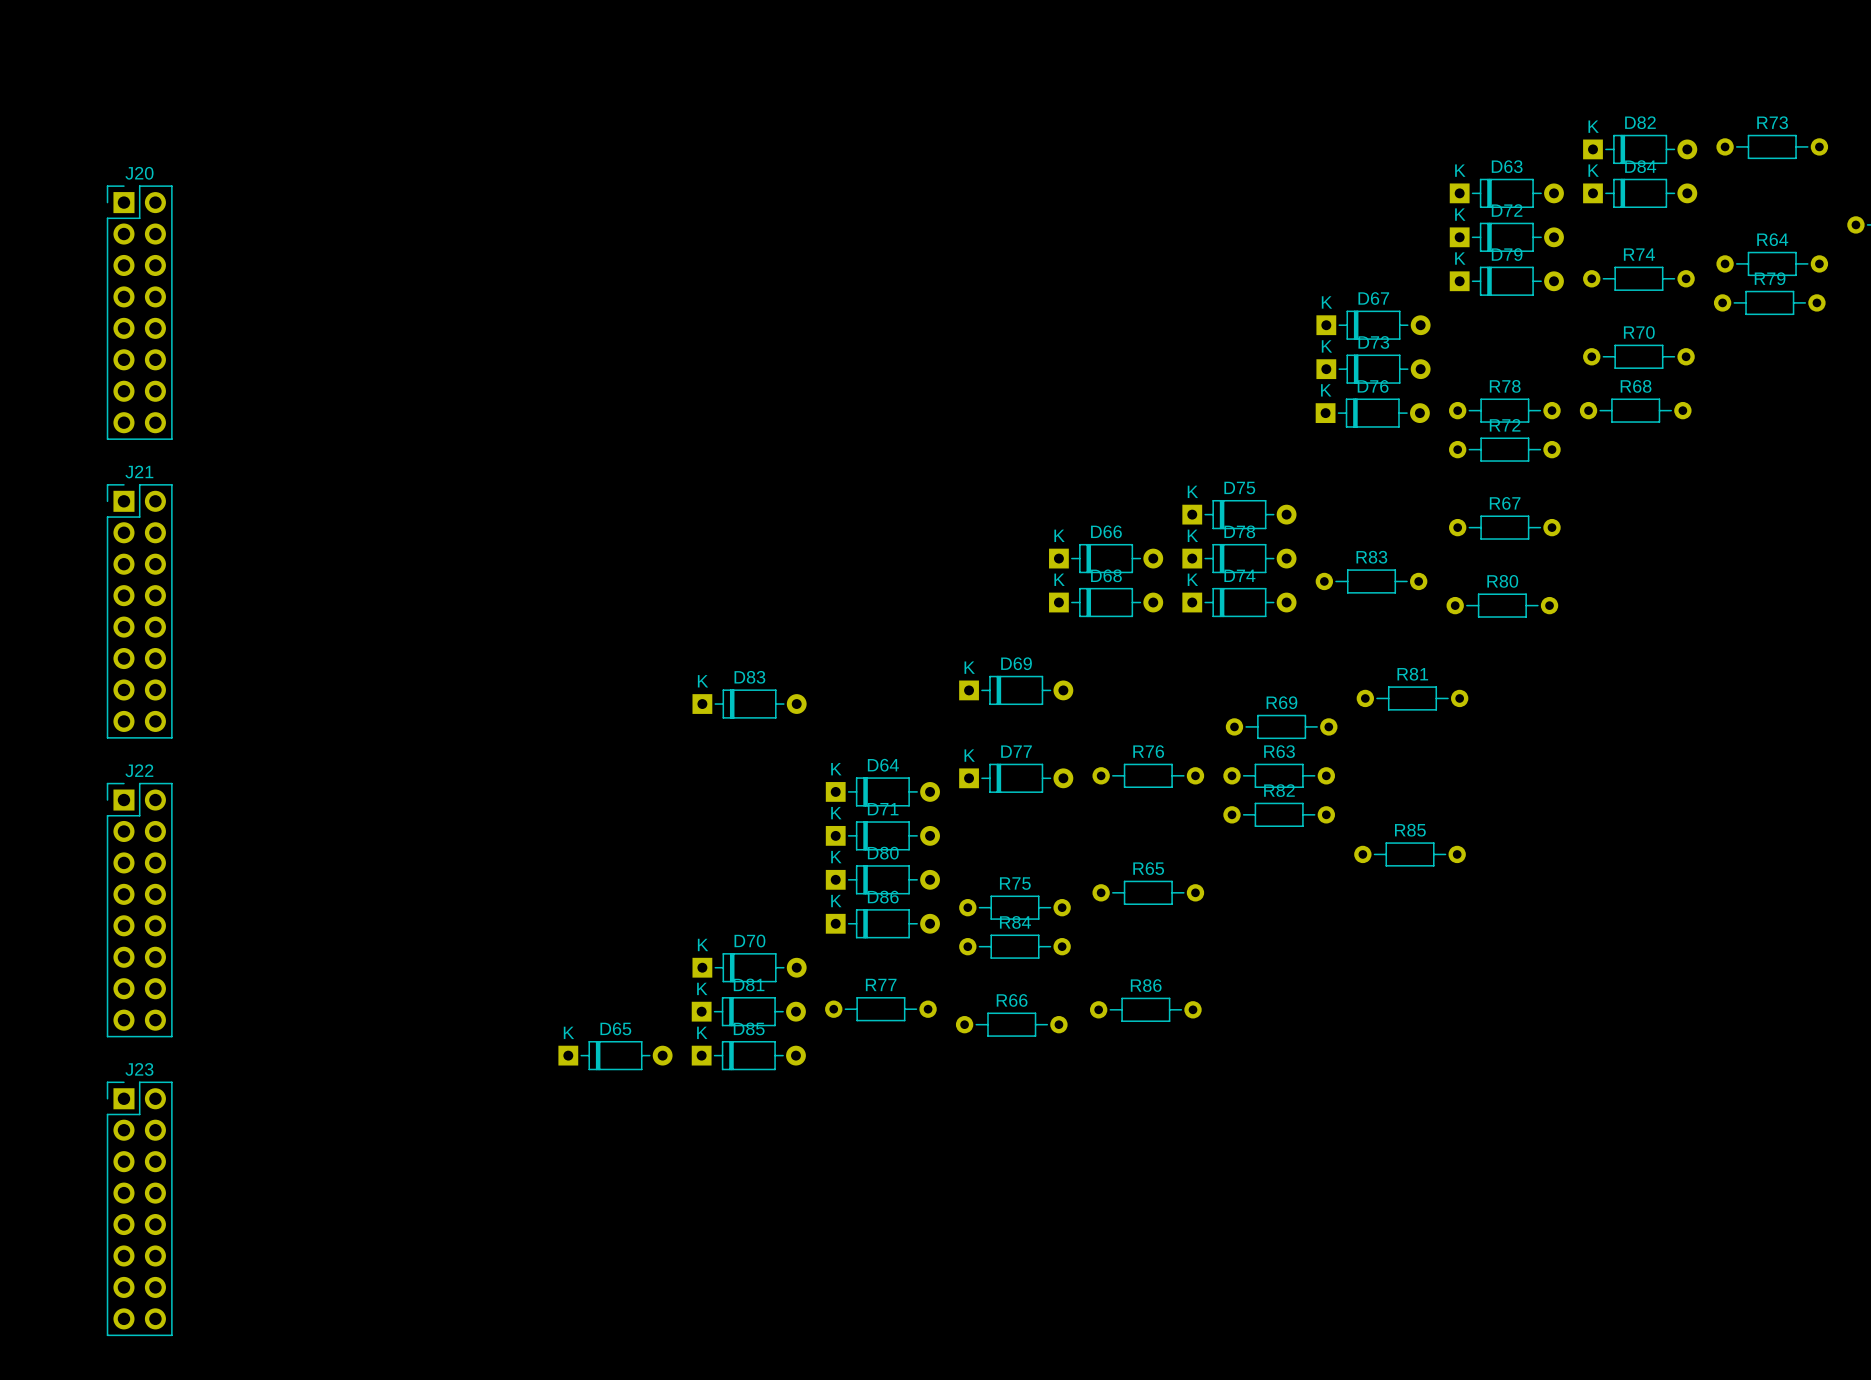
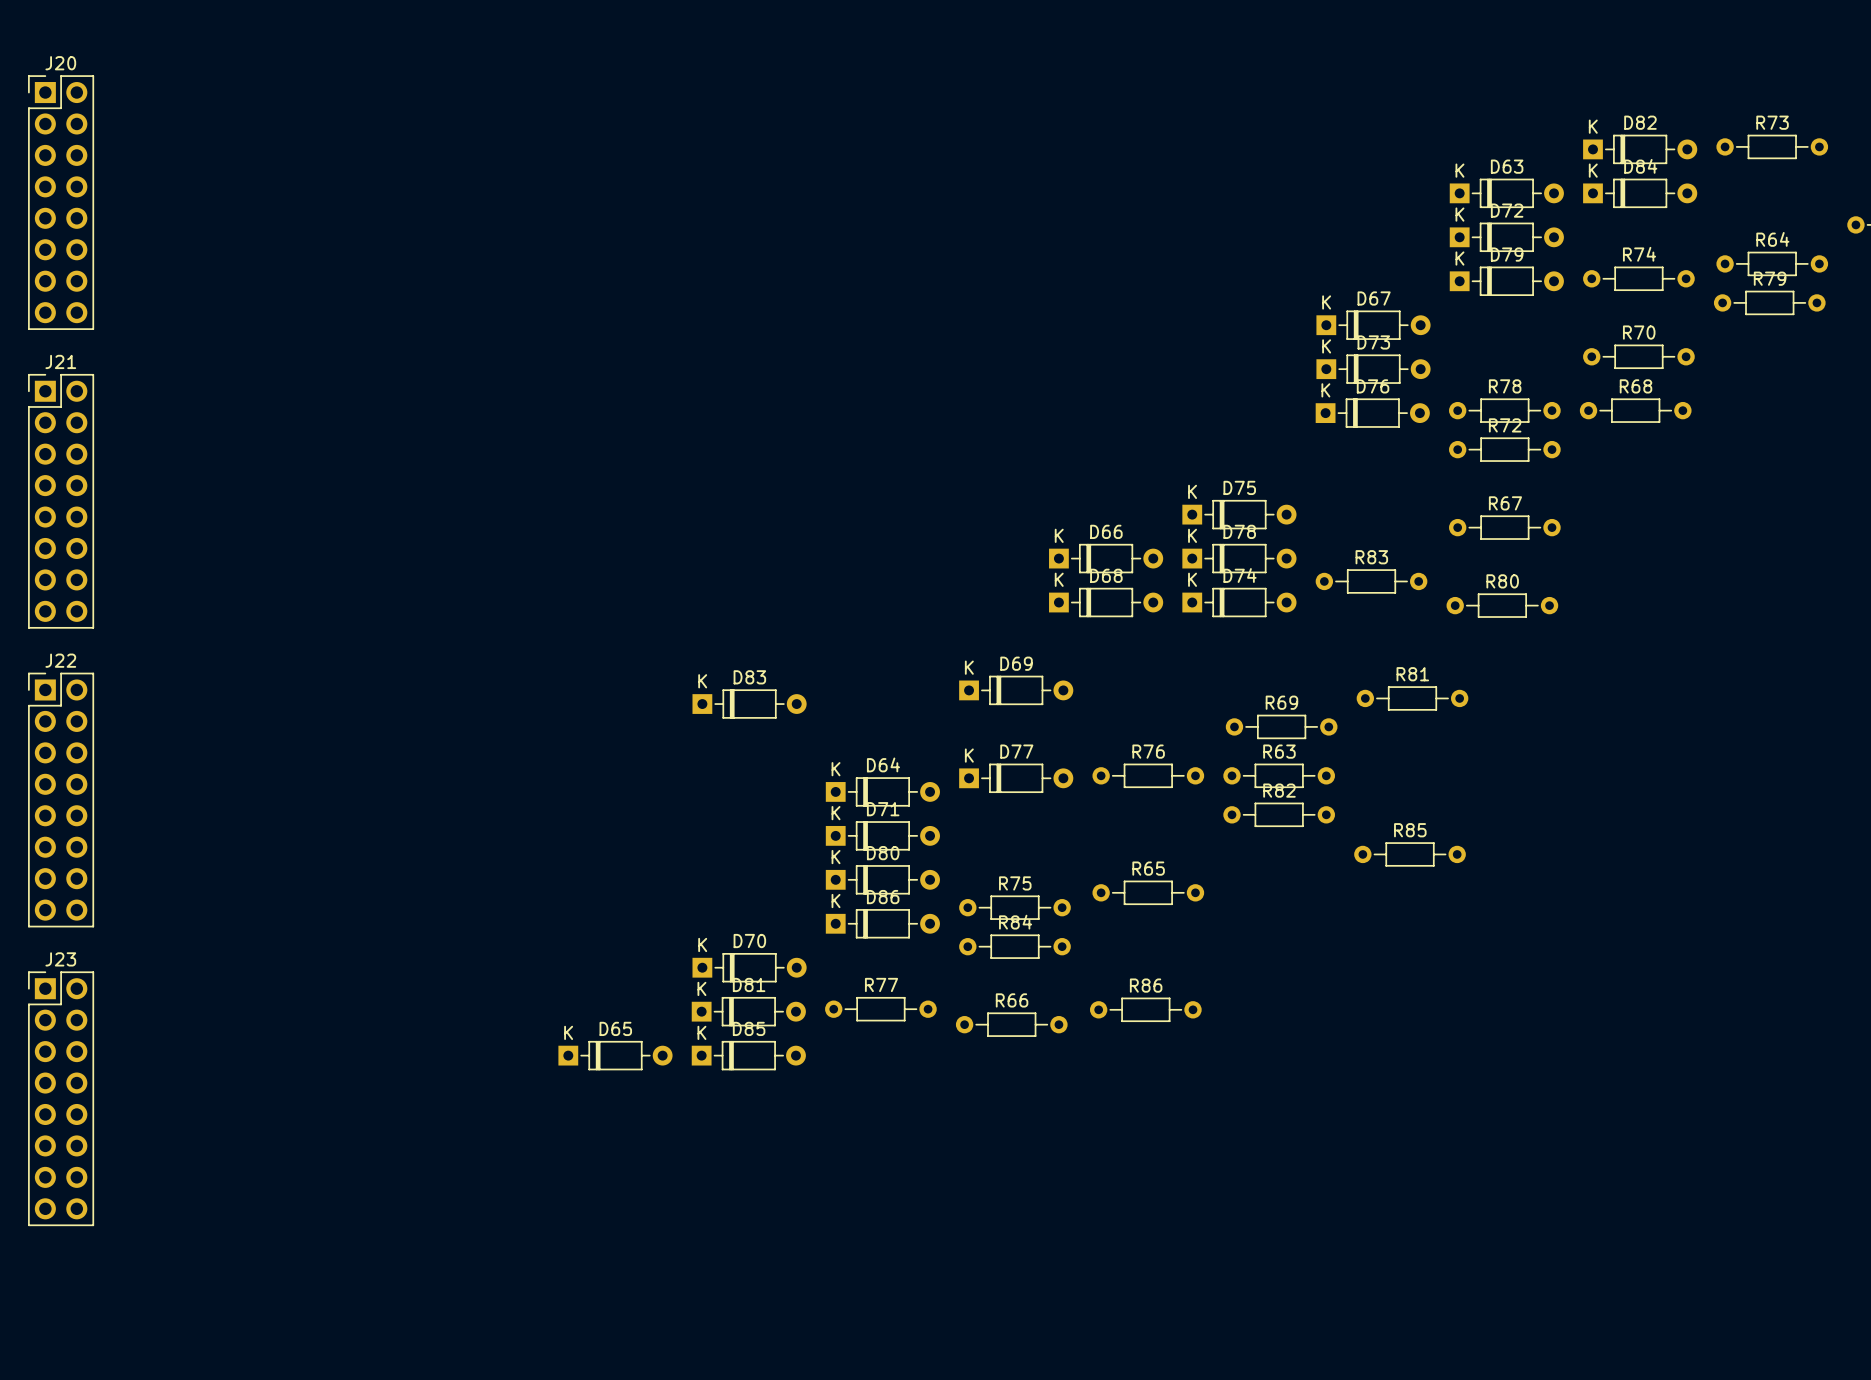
J20 position: (139, 312) -> (61, 202)
J21 position: (139, 611) -> (61, 501)
J22 position: (139, 910) -> (61, 800)
J23 position: (139, 1208) -> (61, 1098)

